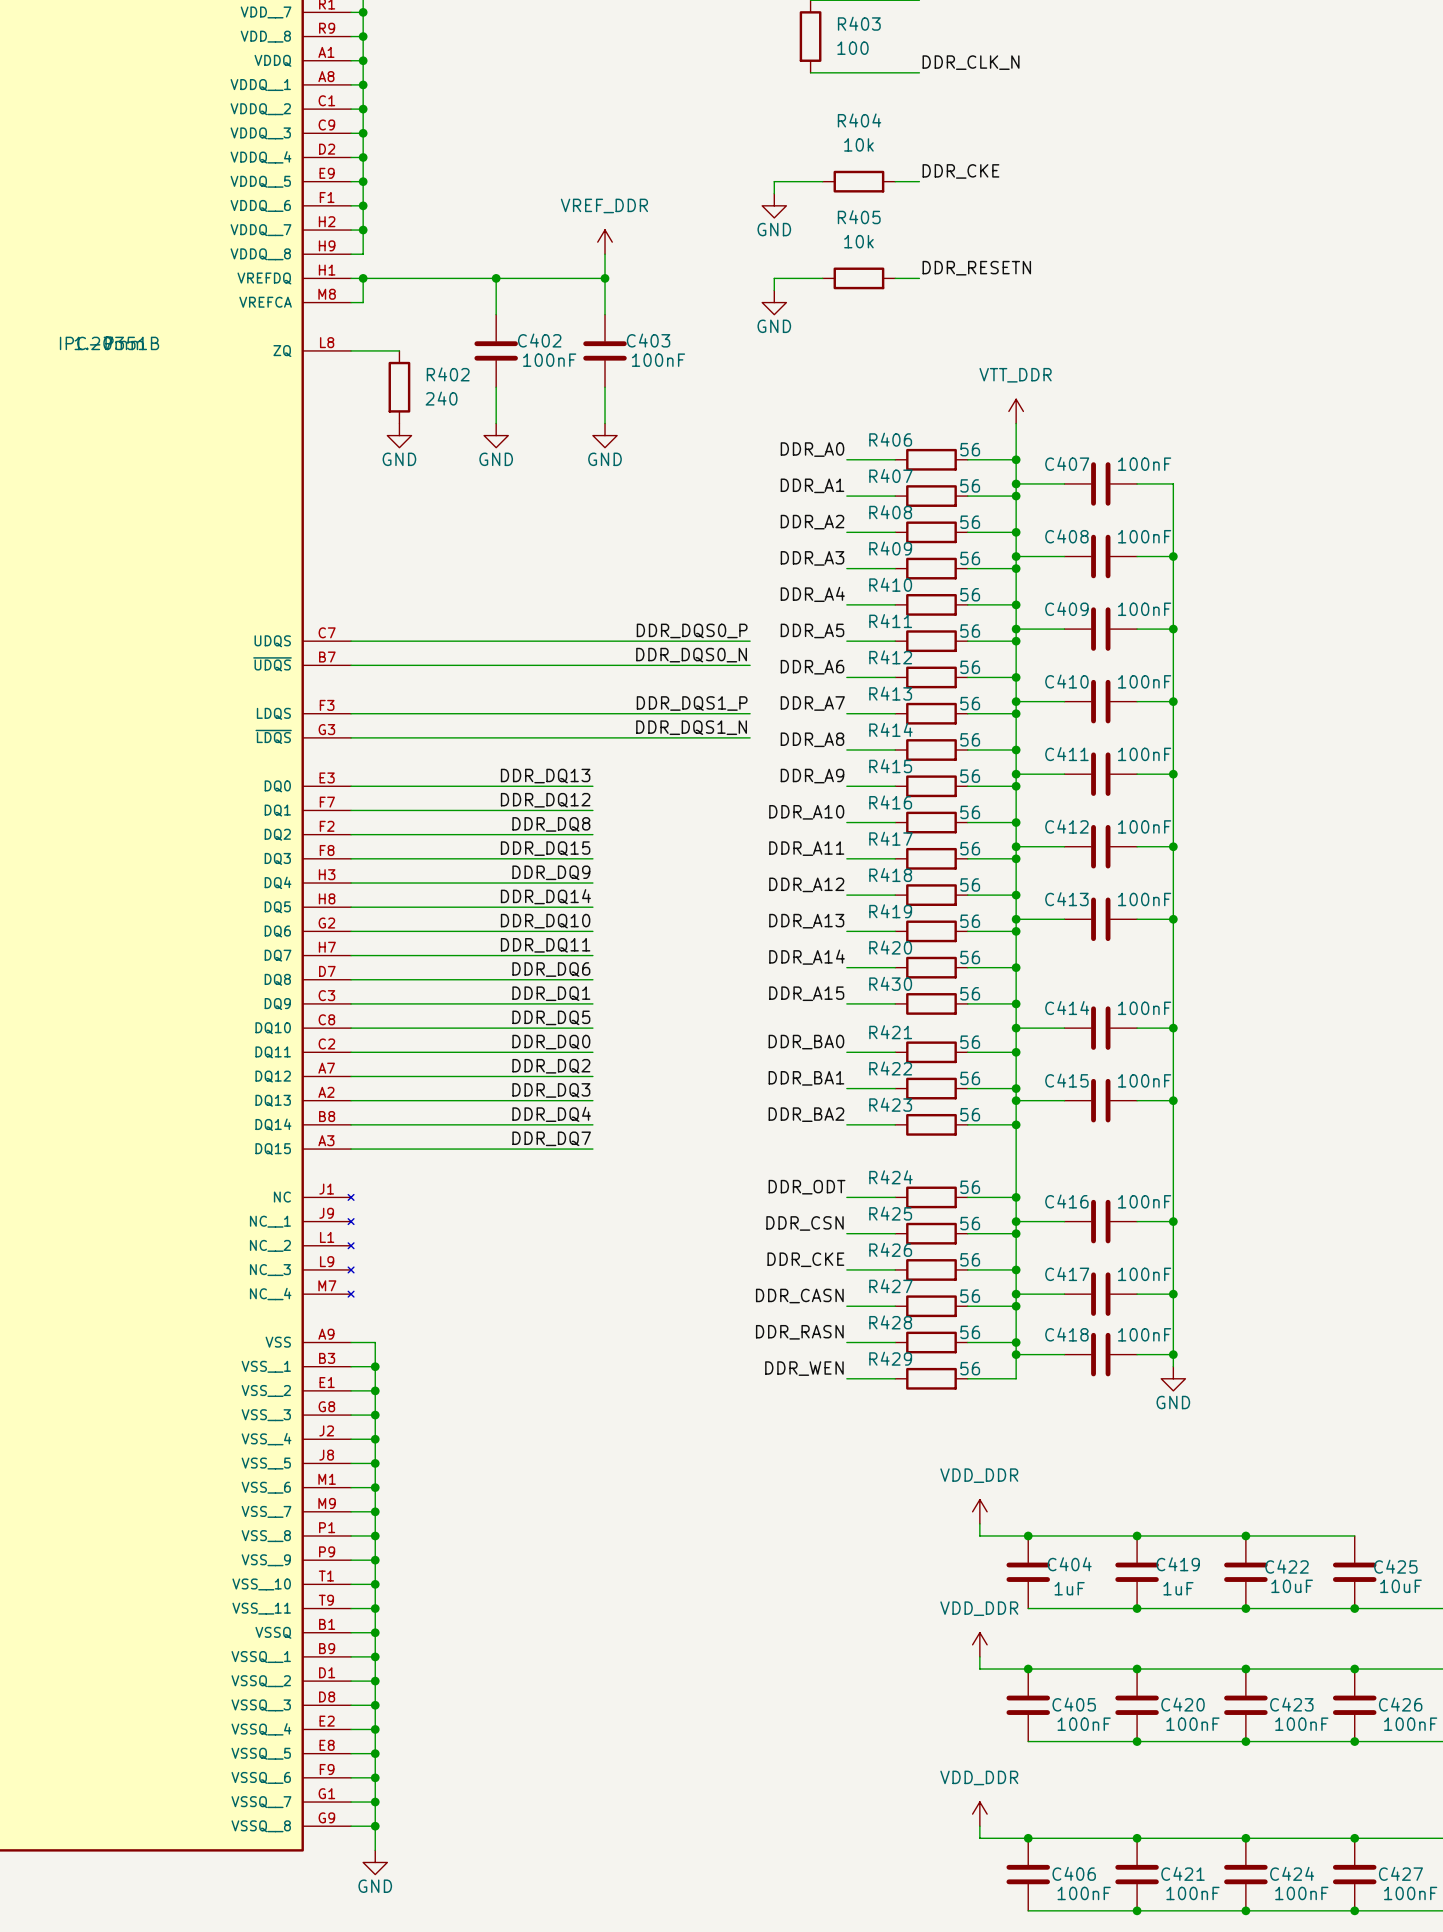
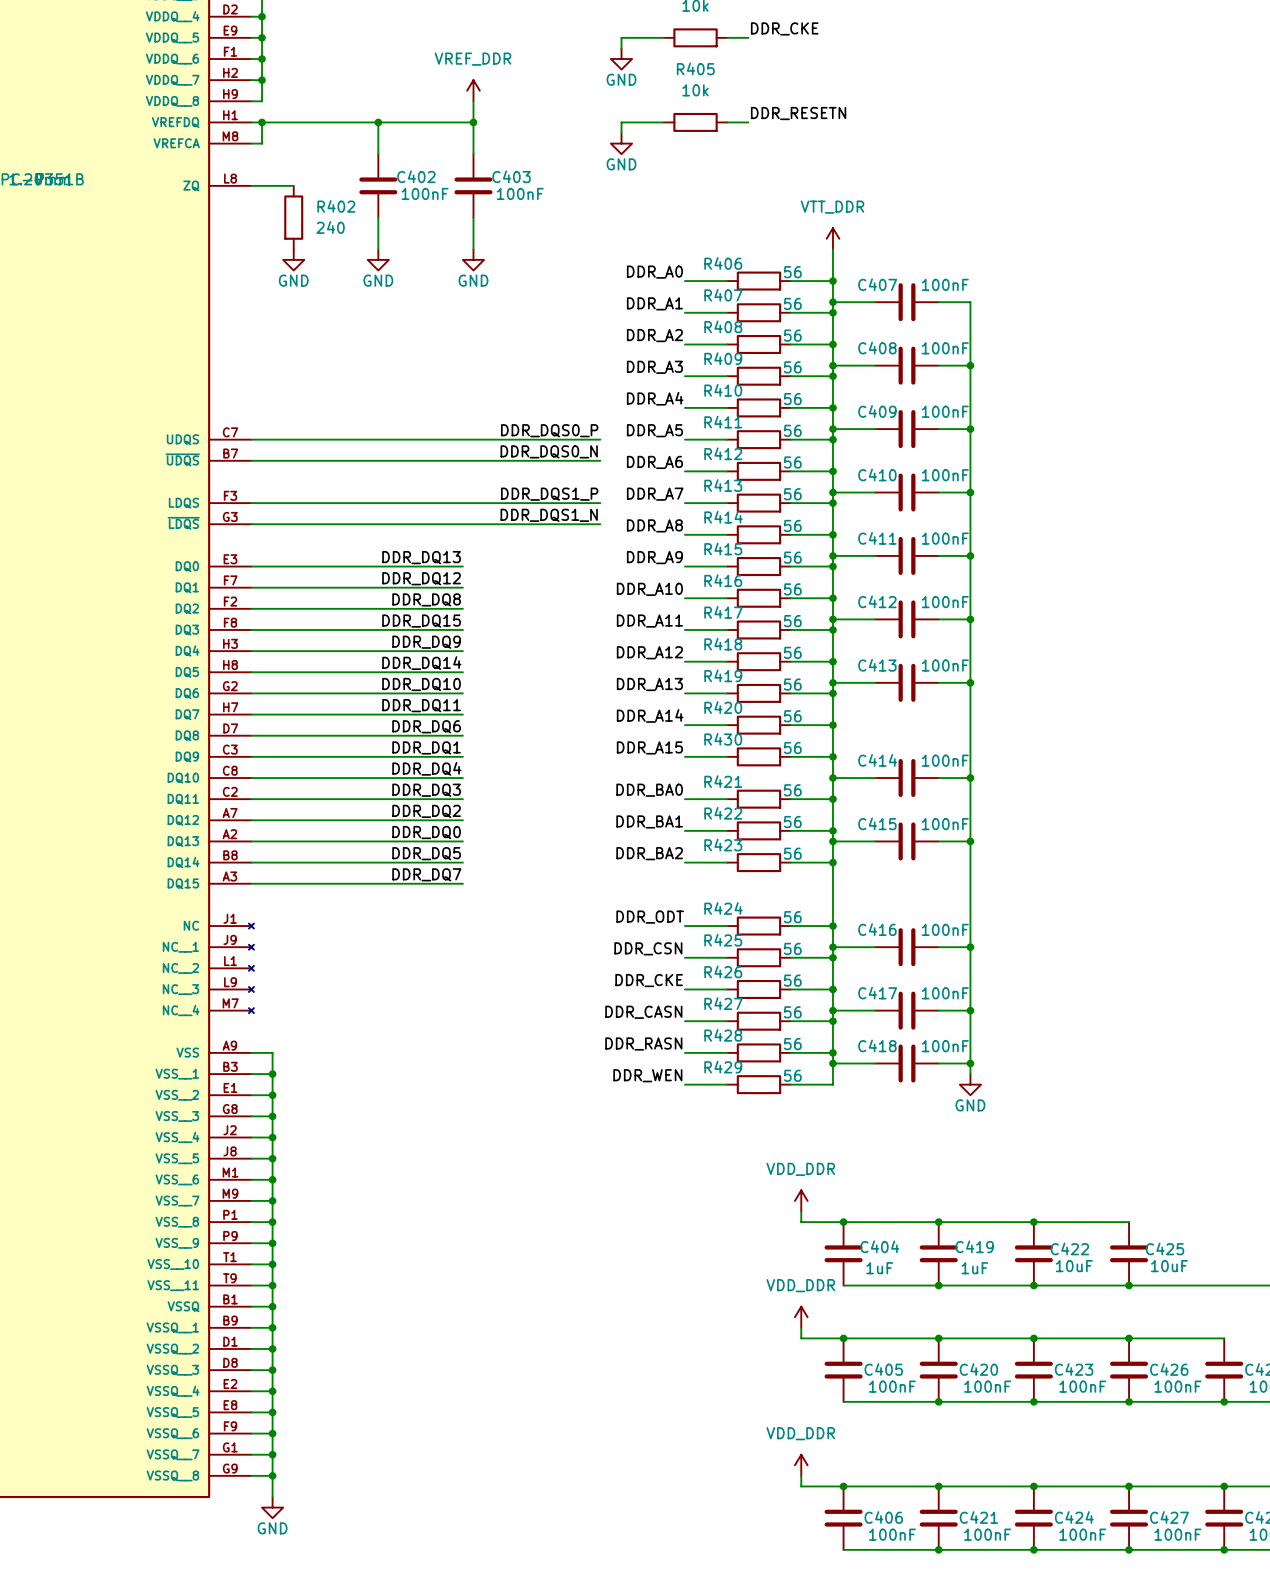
label: DDR_DQ5 (551, 1017) -> DDR_DQ4 (426, 768)
label: DDR_DQ0 (551, 1042) -> DDR_DQ3 (426, 790)
label: DDR_DQ3 (551, 1090) -> DDR_DQ0 (426, 832)
label: DDR_DQ4 (551, 1114) -> DDR_DQ5 (426, 853)

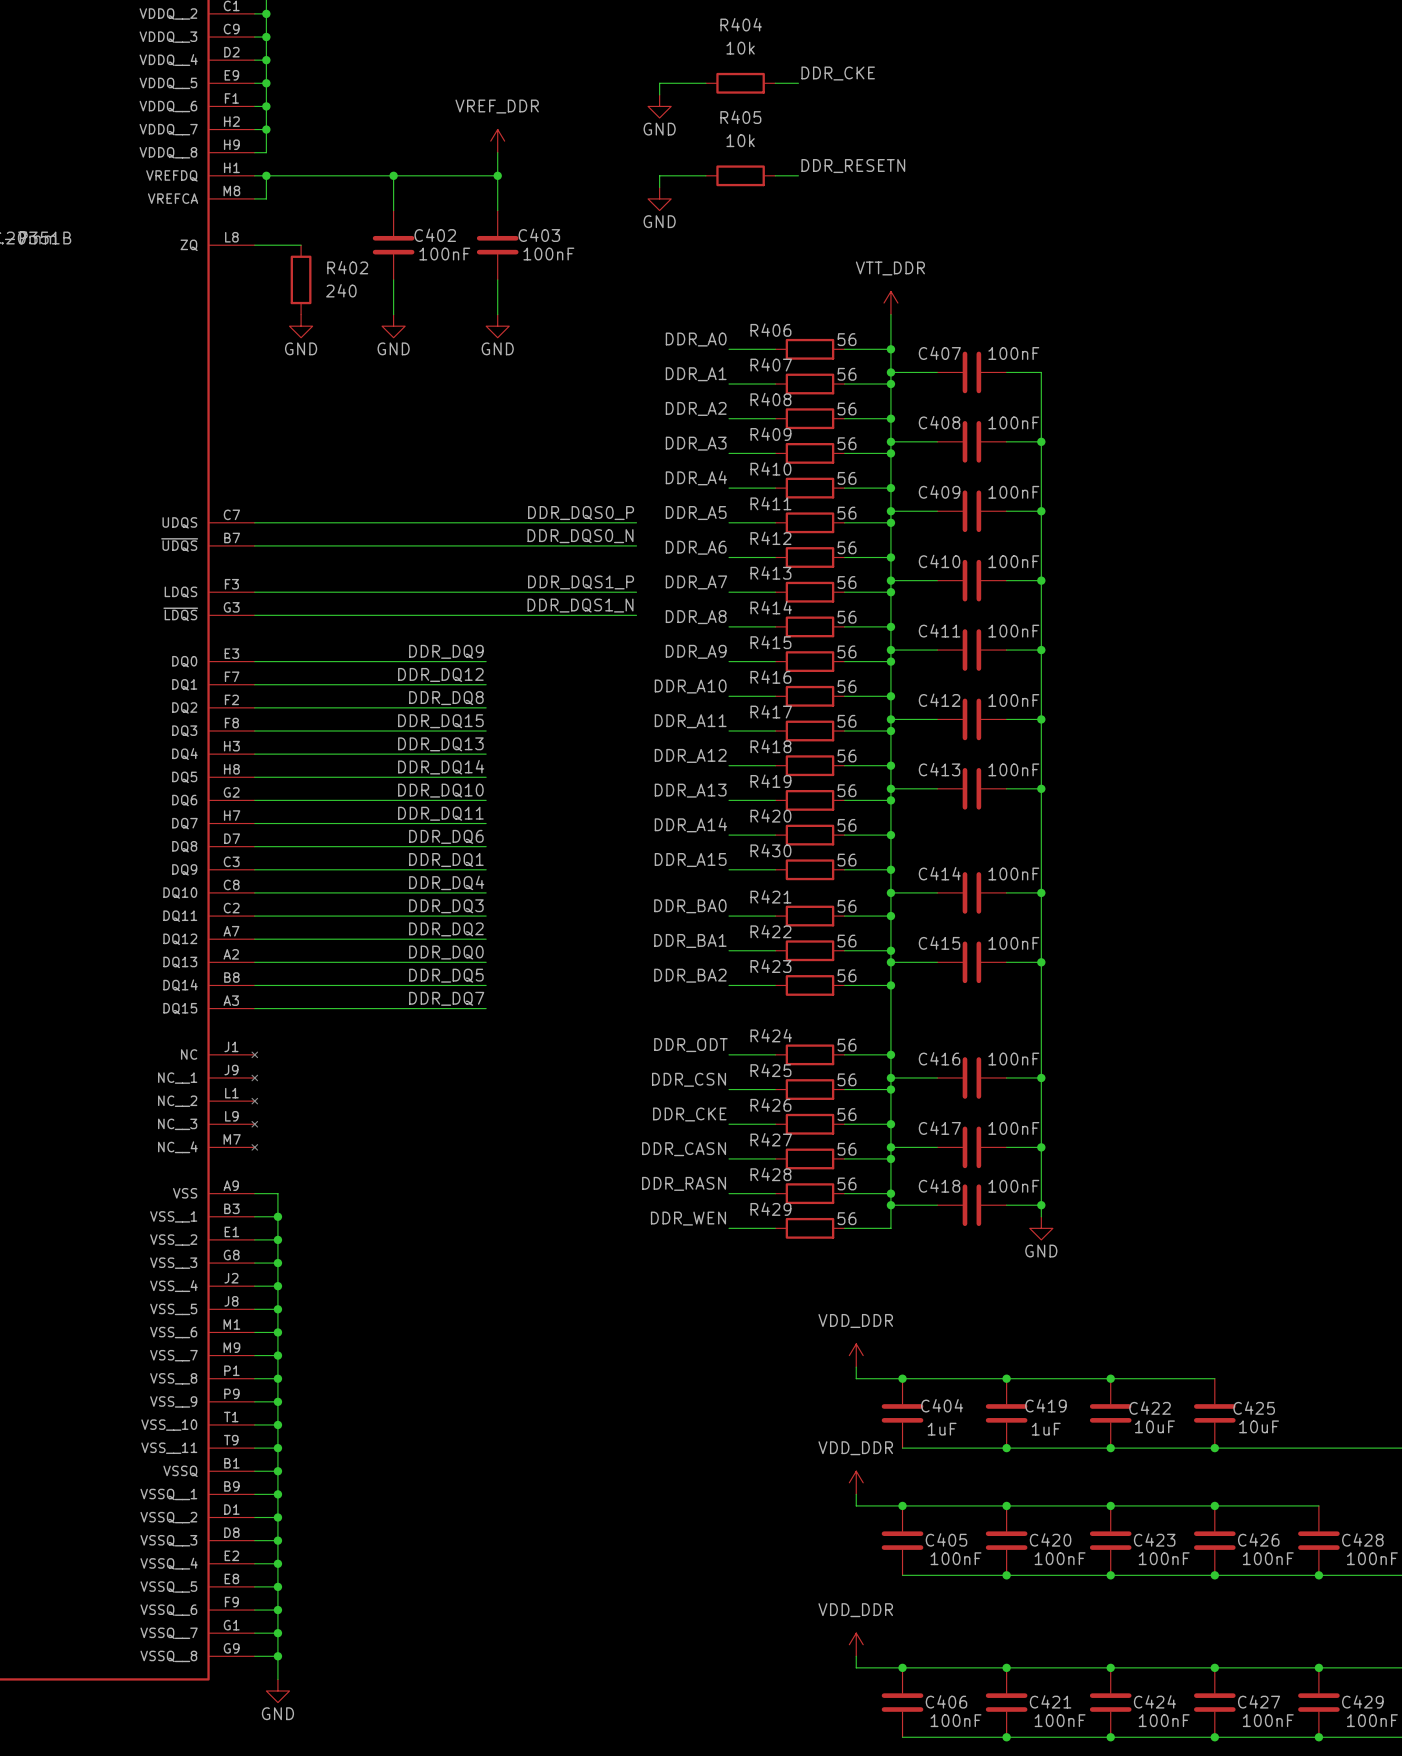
label: DDR_DQ13 (421, 557) -> DDR_DQ9 (446, 651)
label: DDR_DQ9 (426, 642) -> DDR_DQ13 (440, 744)

